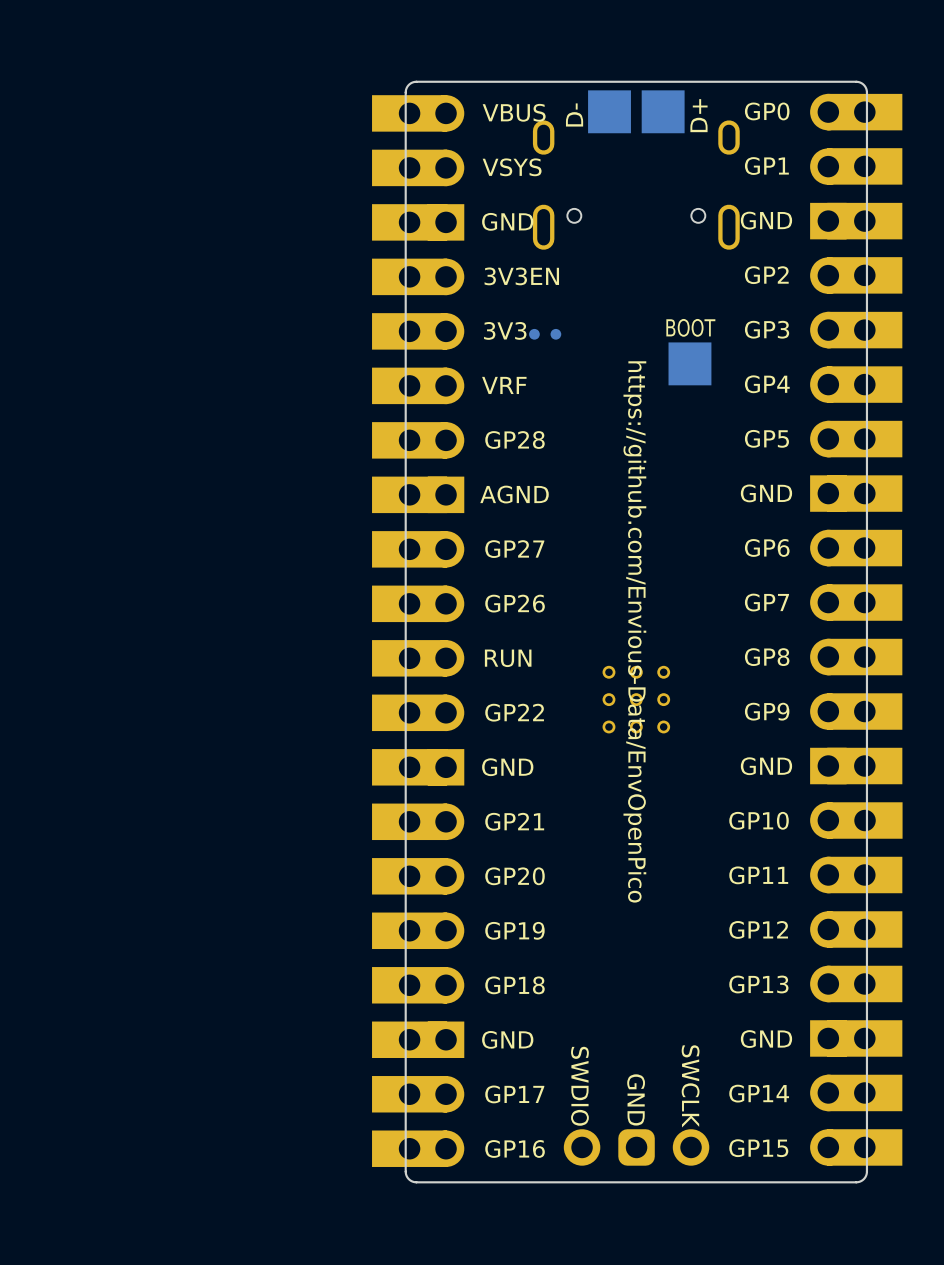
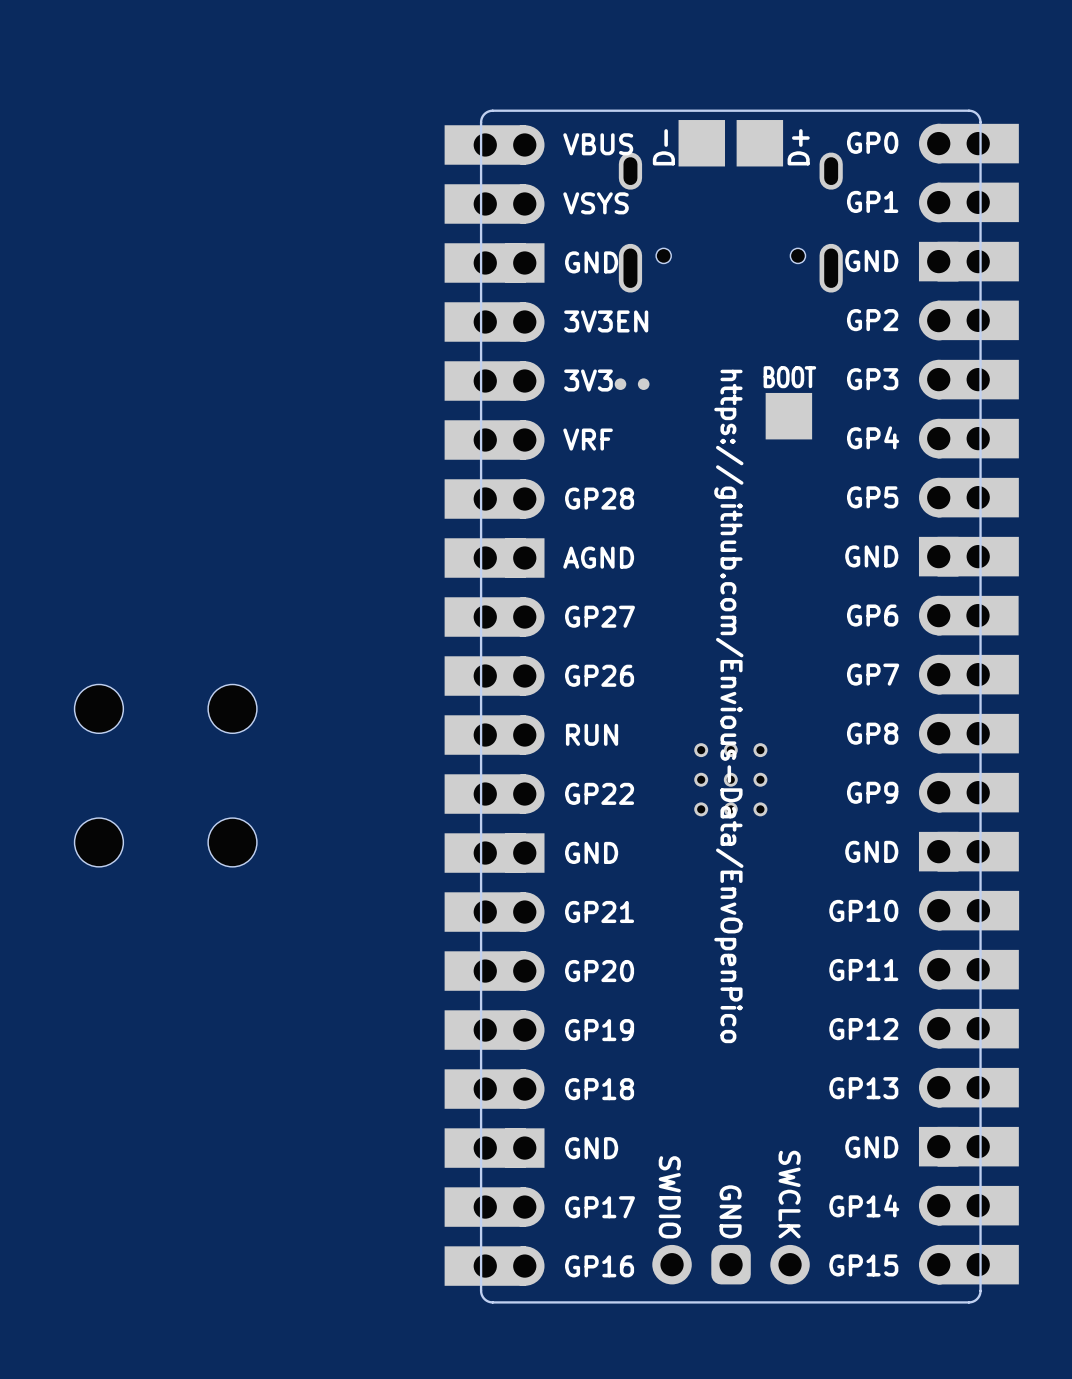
part: none -> (98, 708)
part: none -> (232, 708)
part: none -> (98, 842)
part: none -> (232, 842)

